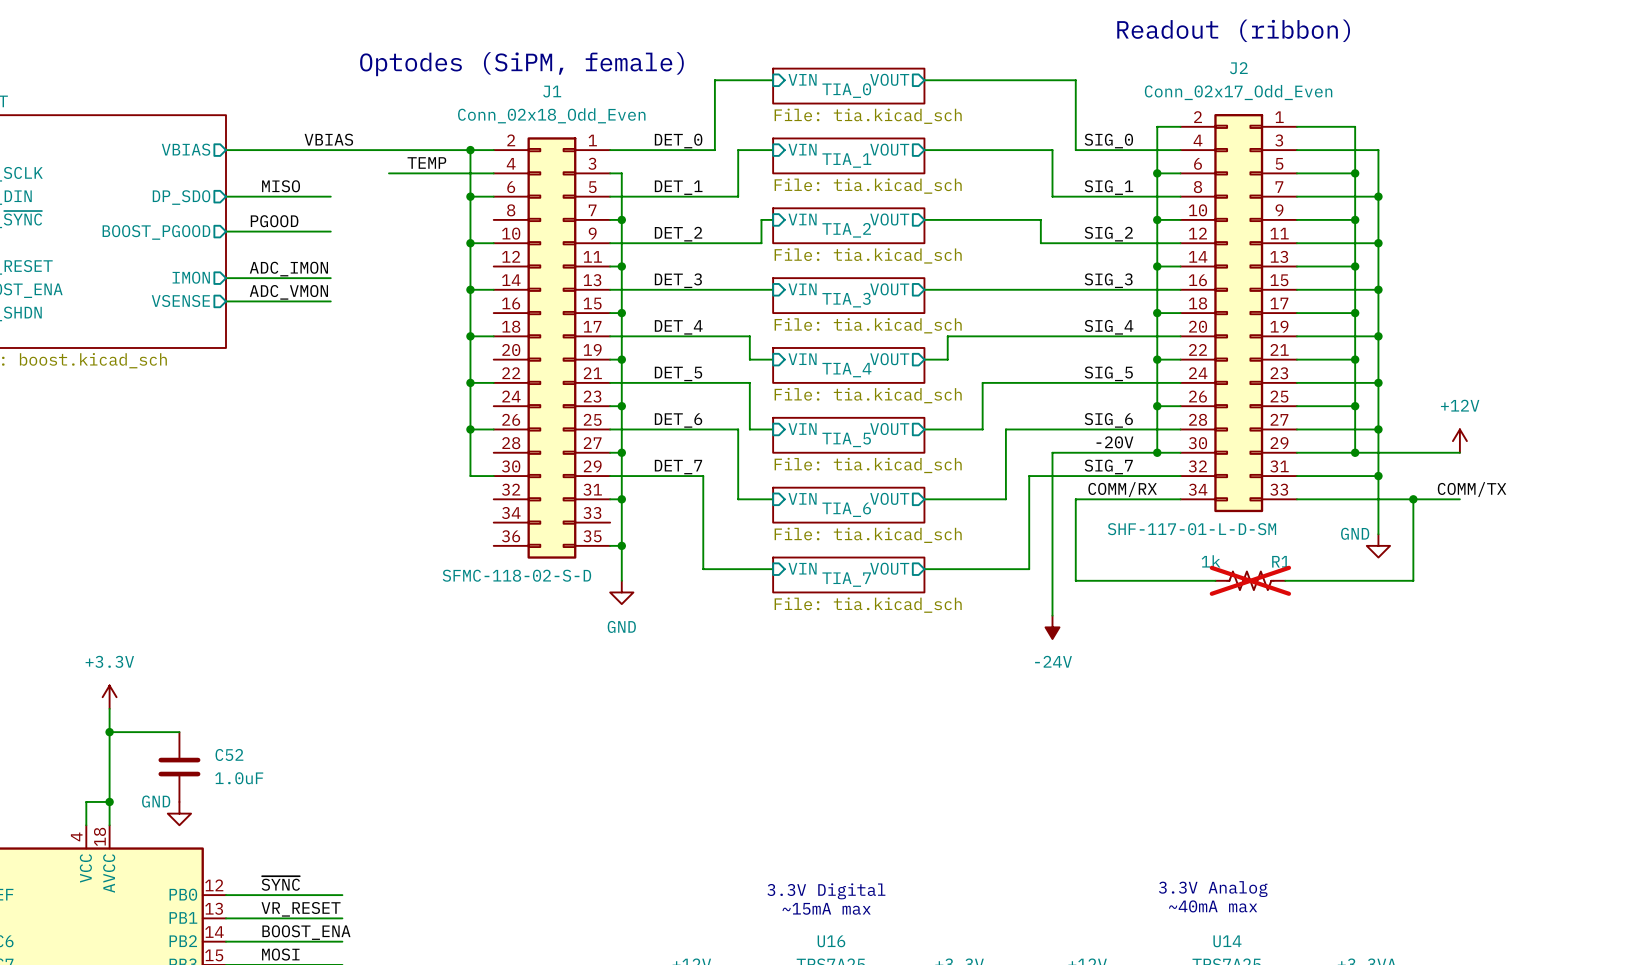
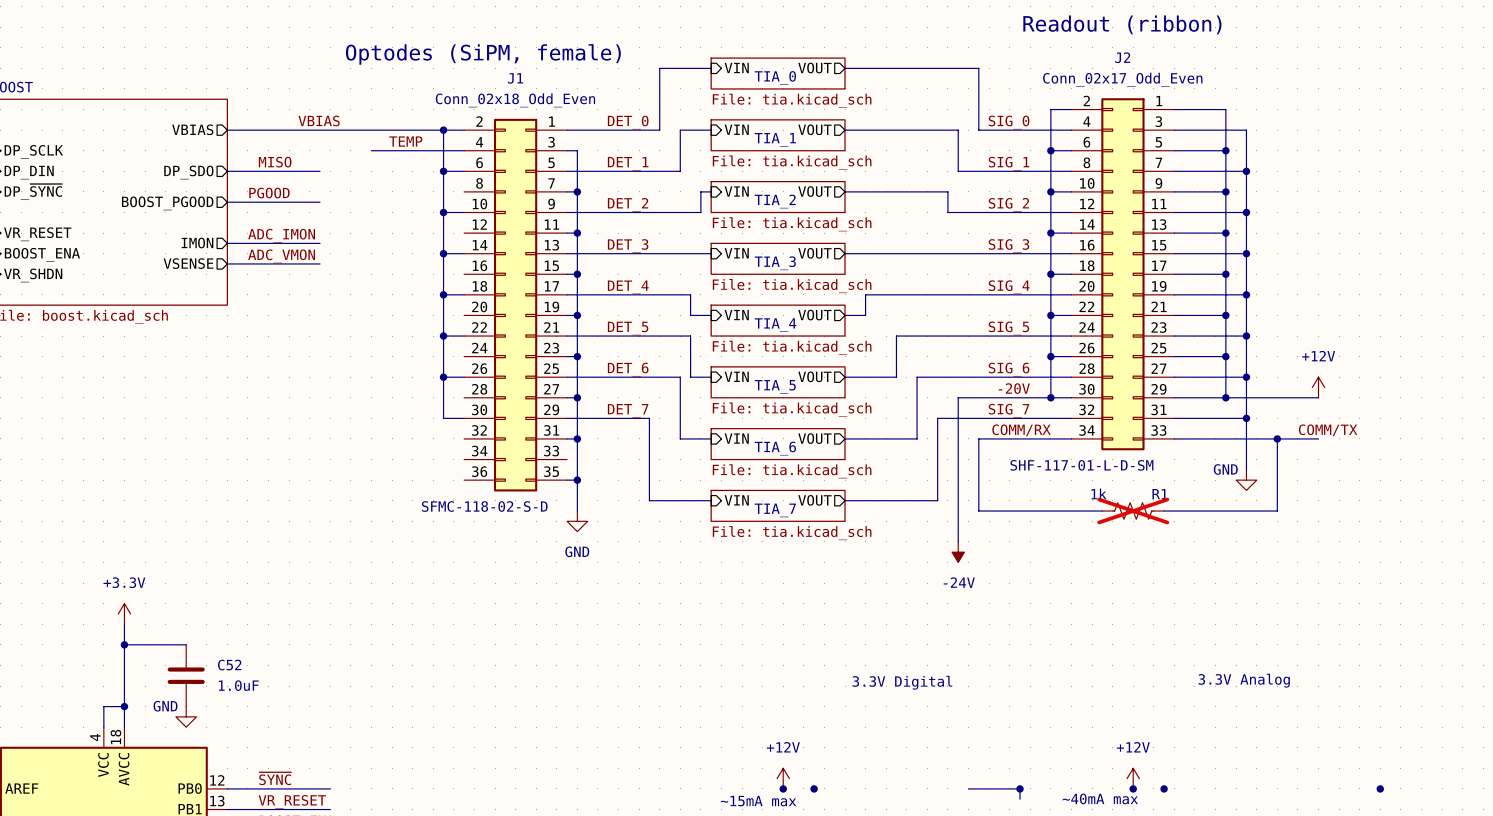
power symbol: none -> +12V (783, 778)
power symbol: none -> +12V (1133, 778)
text position: 3.3V Analog (1213, 889) -> 3.3V Analog (1244, 680)
text position: 3.3V Digital (826, 891) -> 3.3V Digital (902, 682)
junction: none -> (783, 788)
junction: none -> (814, 788)
wire: none -> (968, 788) (1019, 788) (1019, 799)
junction: none -> (1019, 788)
junction: none -> (1133, 788)
junction: none -> (1164, 788)
junction: none -> (1380, 788)

